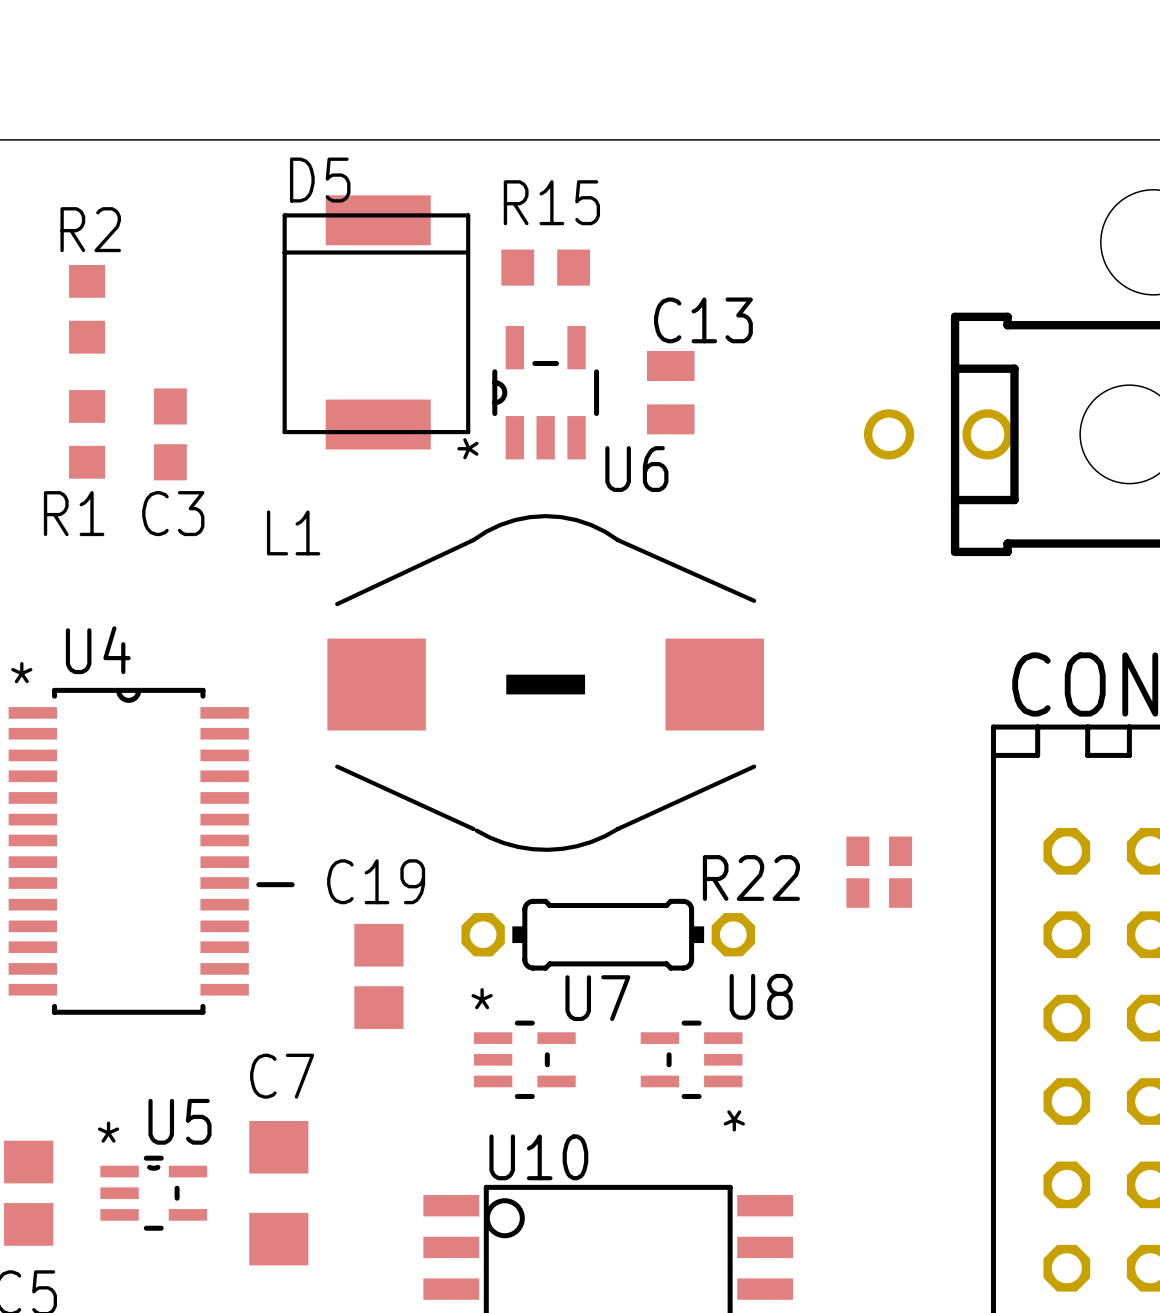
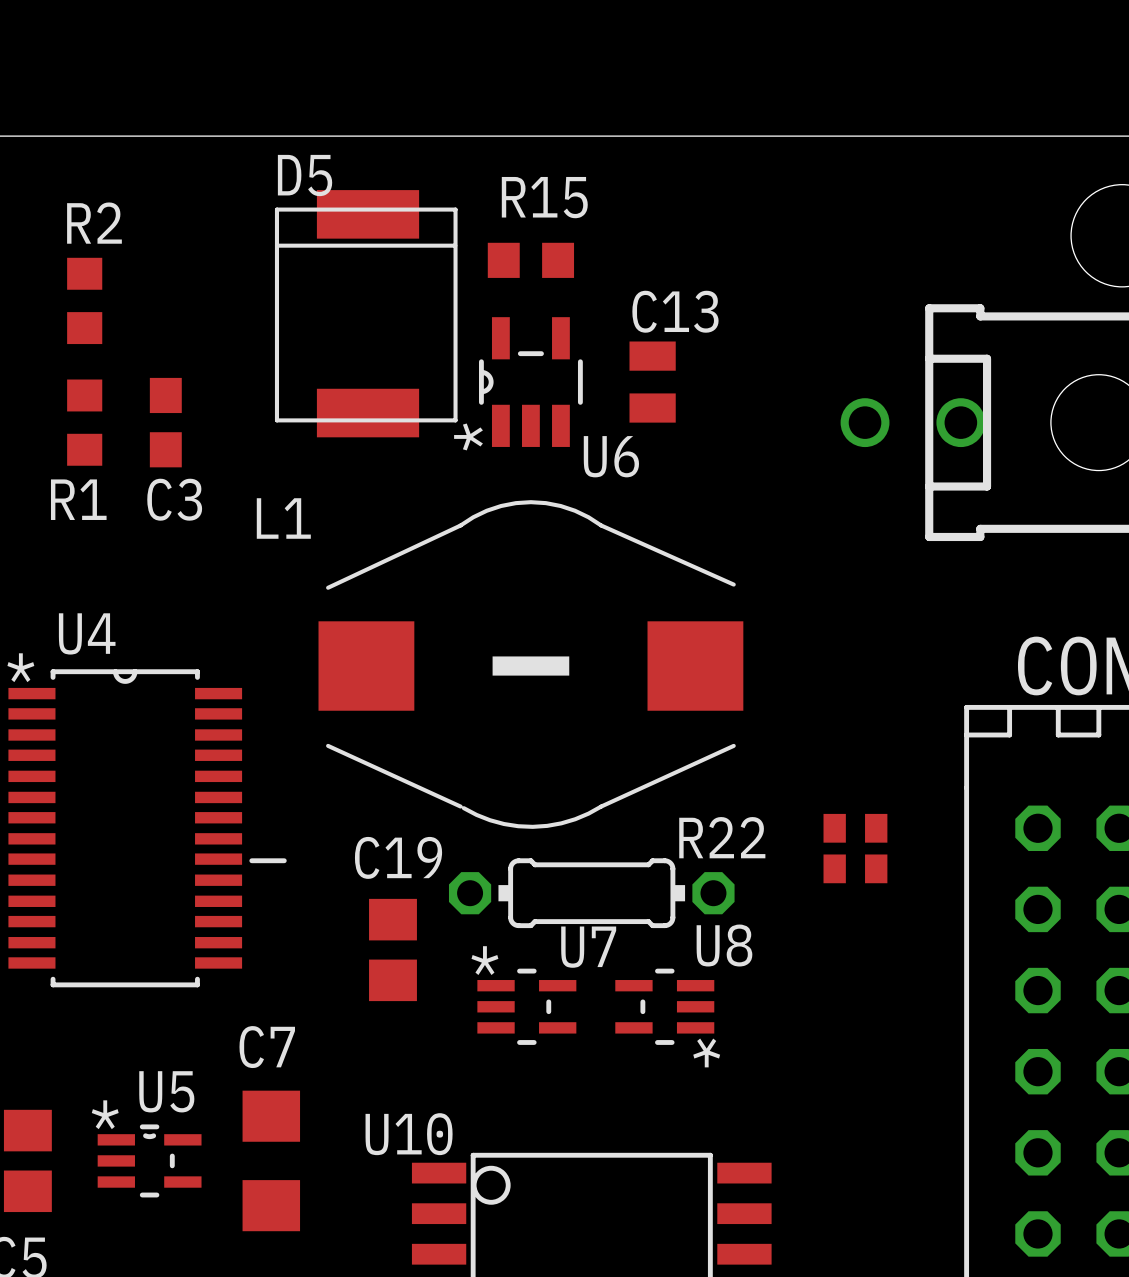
R22 position: (608, 934) -> (591, 893)
C19 position: (378, 976) -> (392, 949)
U7 position: (524, 1059) -> (526, 1006)
U8 position: (691, 1059) -> (664, 1006)
U10 name position: U10 (538, 1157) -> U10 (409, 1134)

